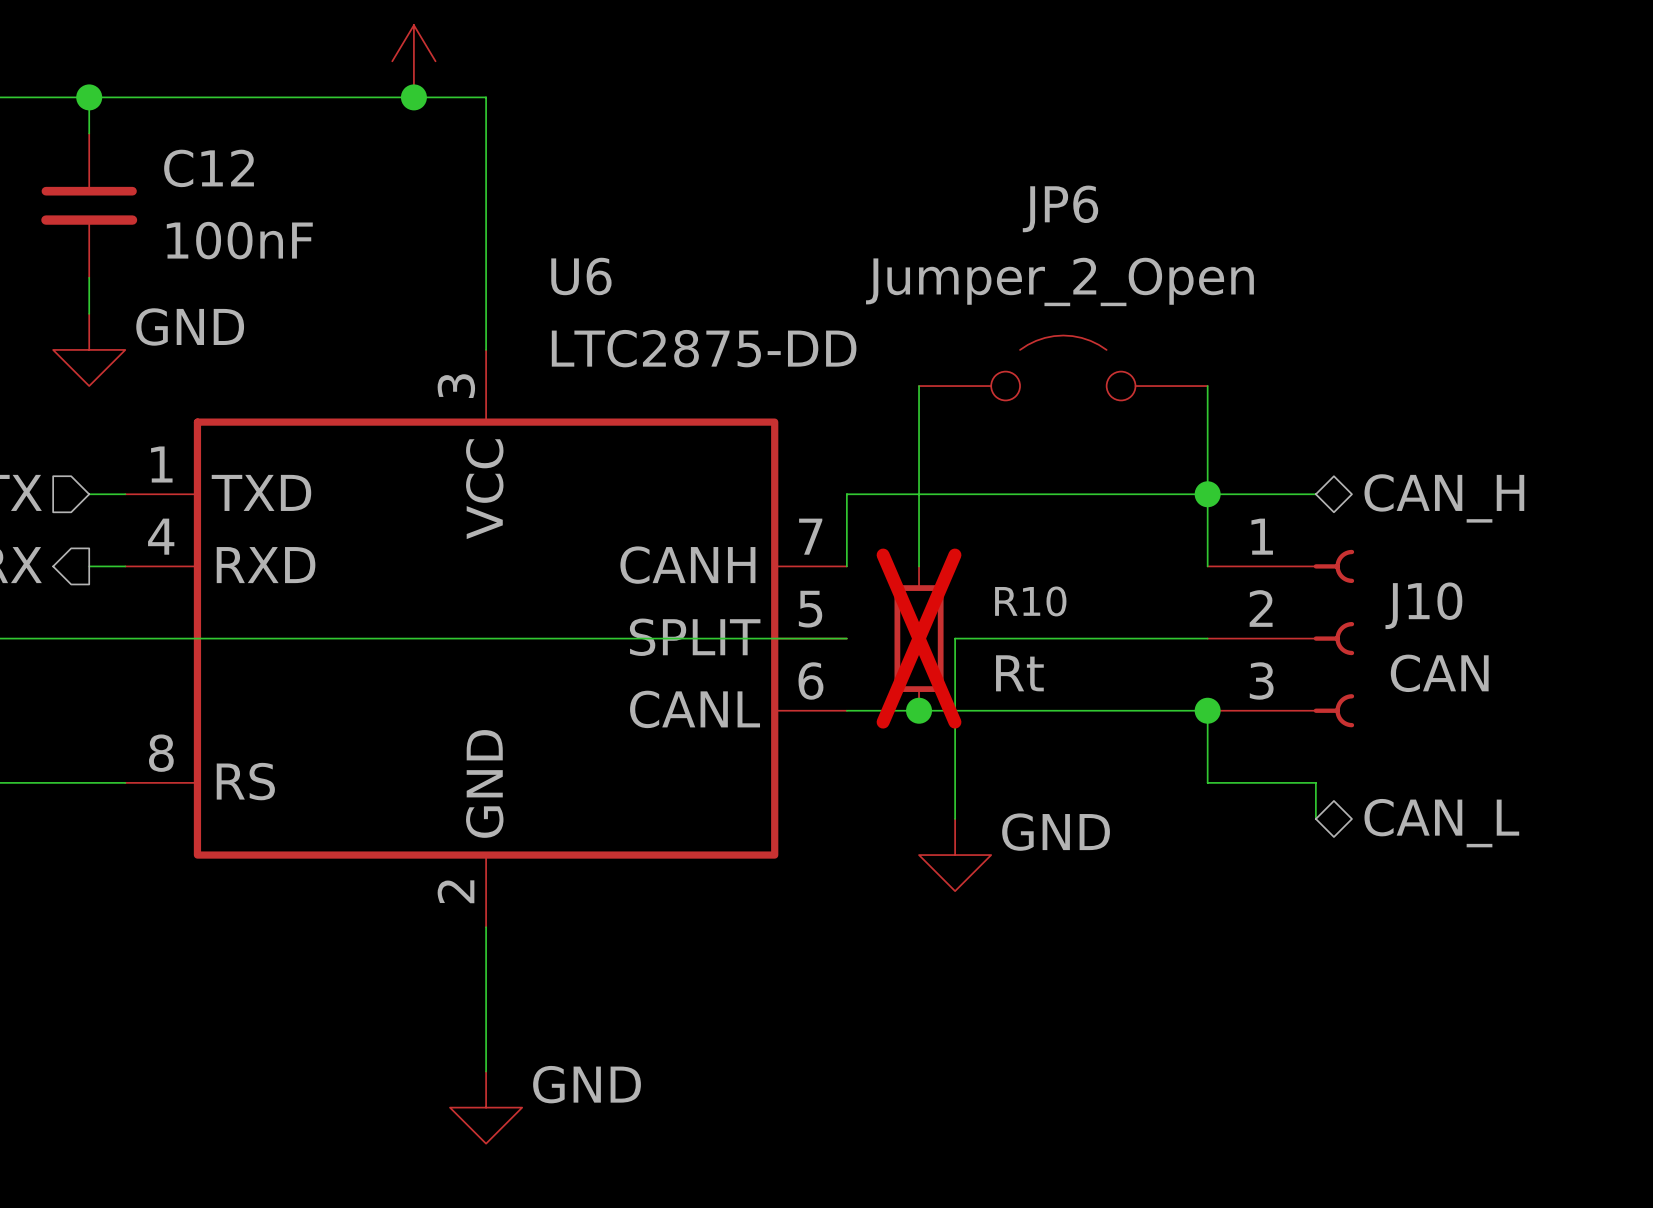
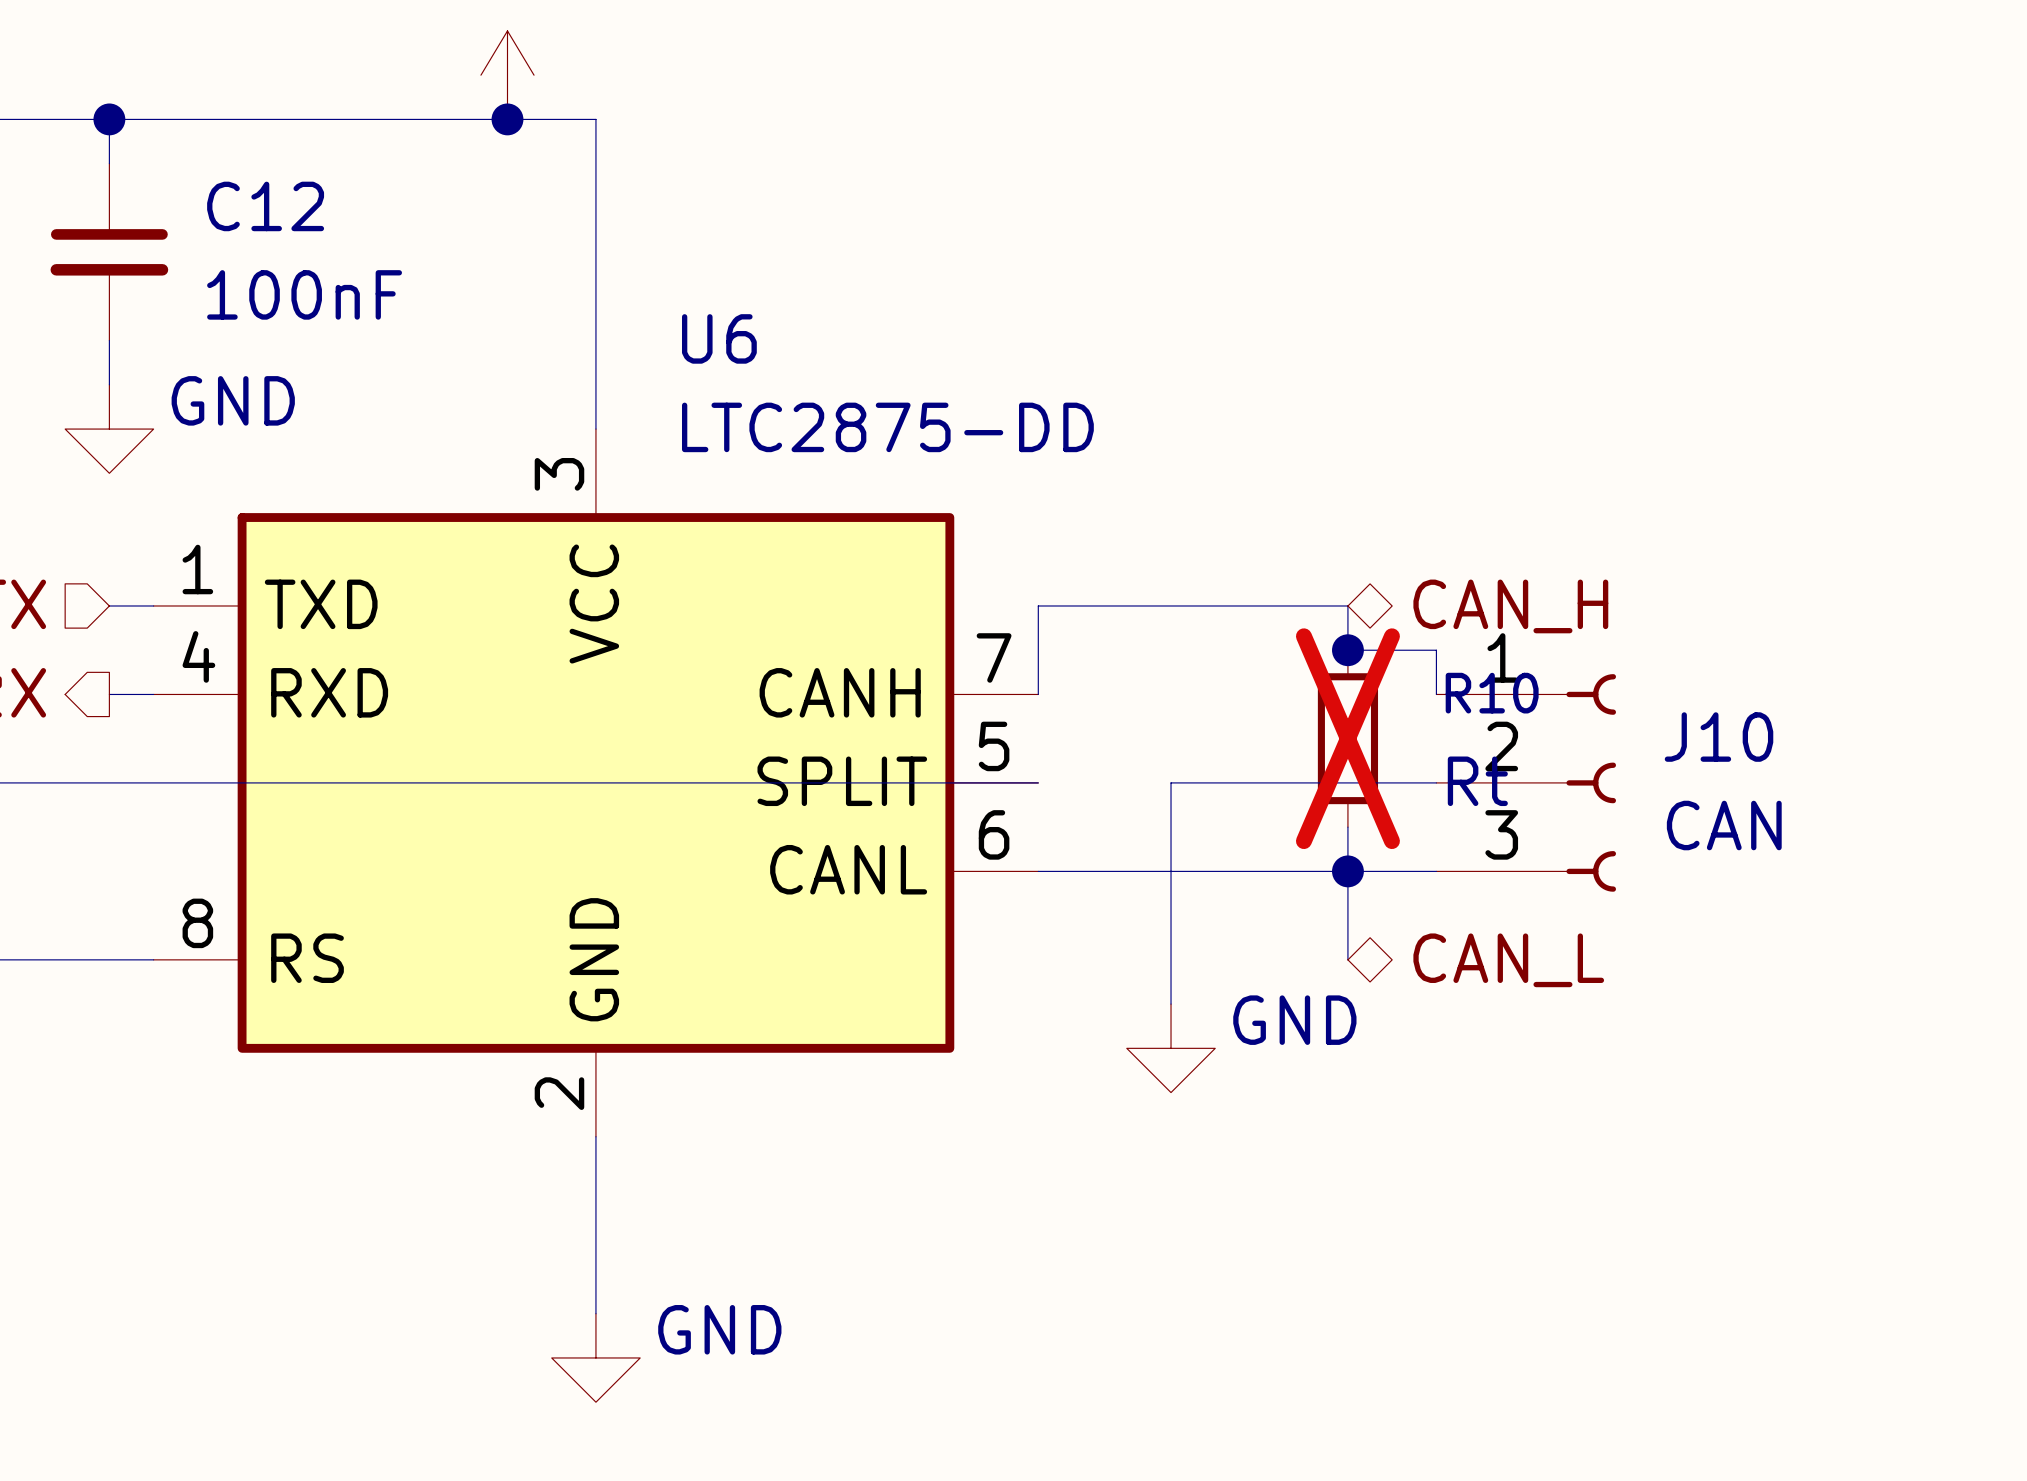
JP6: Jumper_2_Open (1063, 367) -> none
wire: (919, 386) (919, 566) -> none
wire: (1207, 386) (1207, 566) -> none
wire: (1099, 494) (1315, 494) -> (1347, 605) (1347, 650) (1436, 650) (1436, 694)
junction: (1207, 494) -> none
hierarchical label position: CAN_H (1444, 498) -> CAN_H (1510, 606)
junction: none -> (1347, 650)
R10 position: (919, 638) -> (1347, 738)
J10 position: (1280, 638) -> (1526, 782)
wire: none -> (1347, 827) (1347, 959)
junction: (919, 710) -> none
junction: none -> (1347, 871)
wire: (1171, 710) (1207, 710) (1207, 782) (1315, 782) (1315, 818) -> none
junction: (1207, 710) -> none
hierarchical label position: CAN_L (1441, 823) -> CAN_L (1508, 960)

